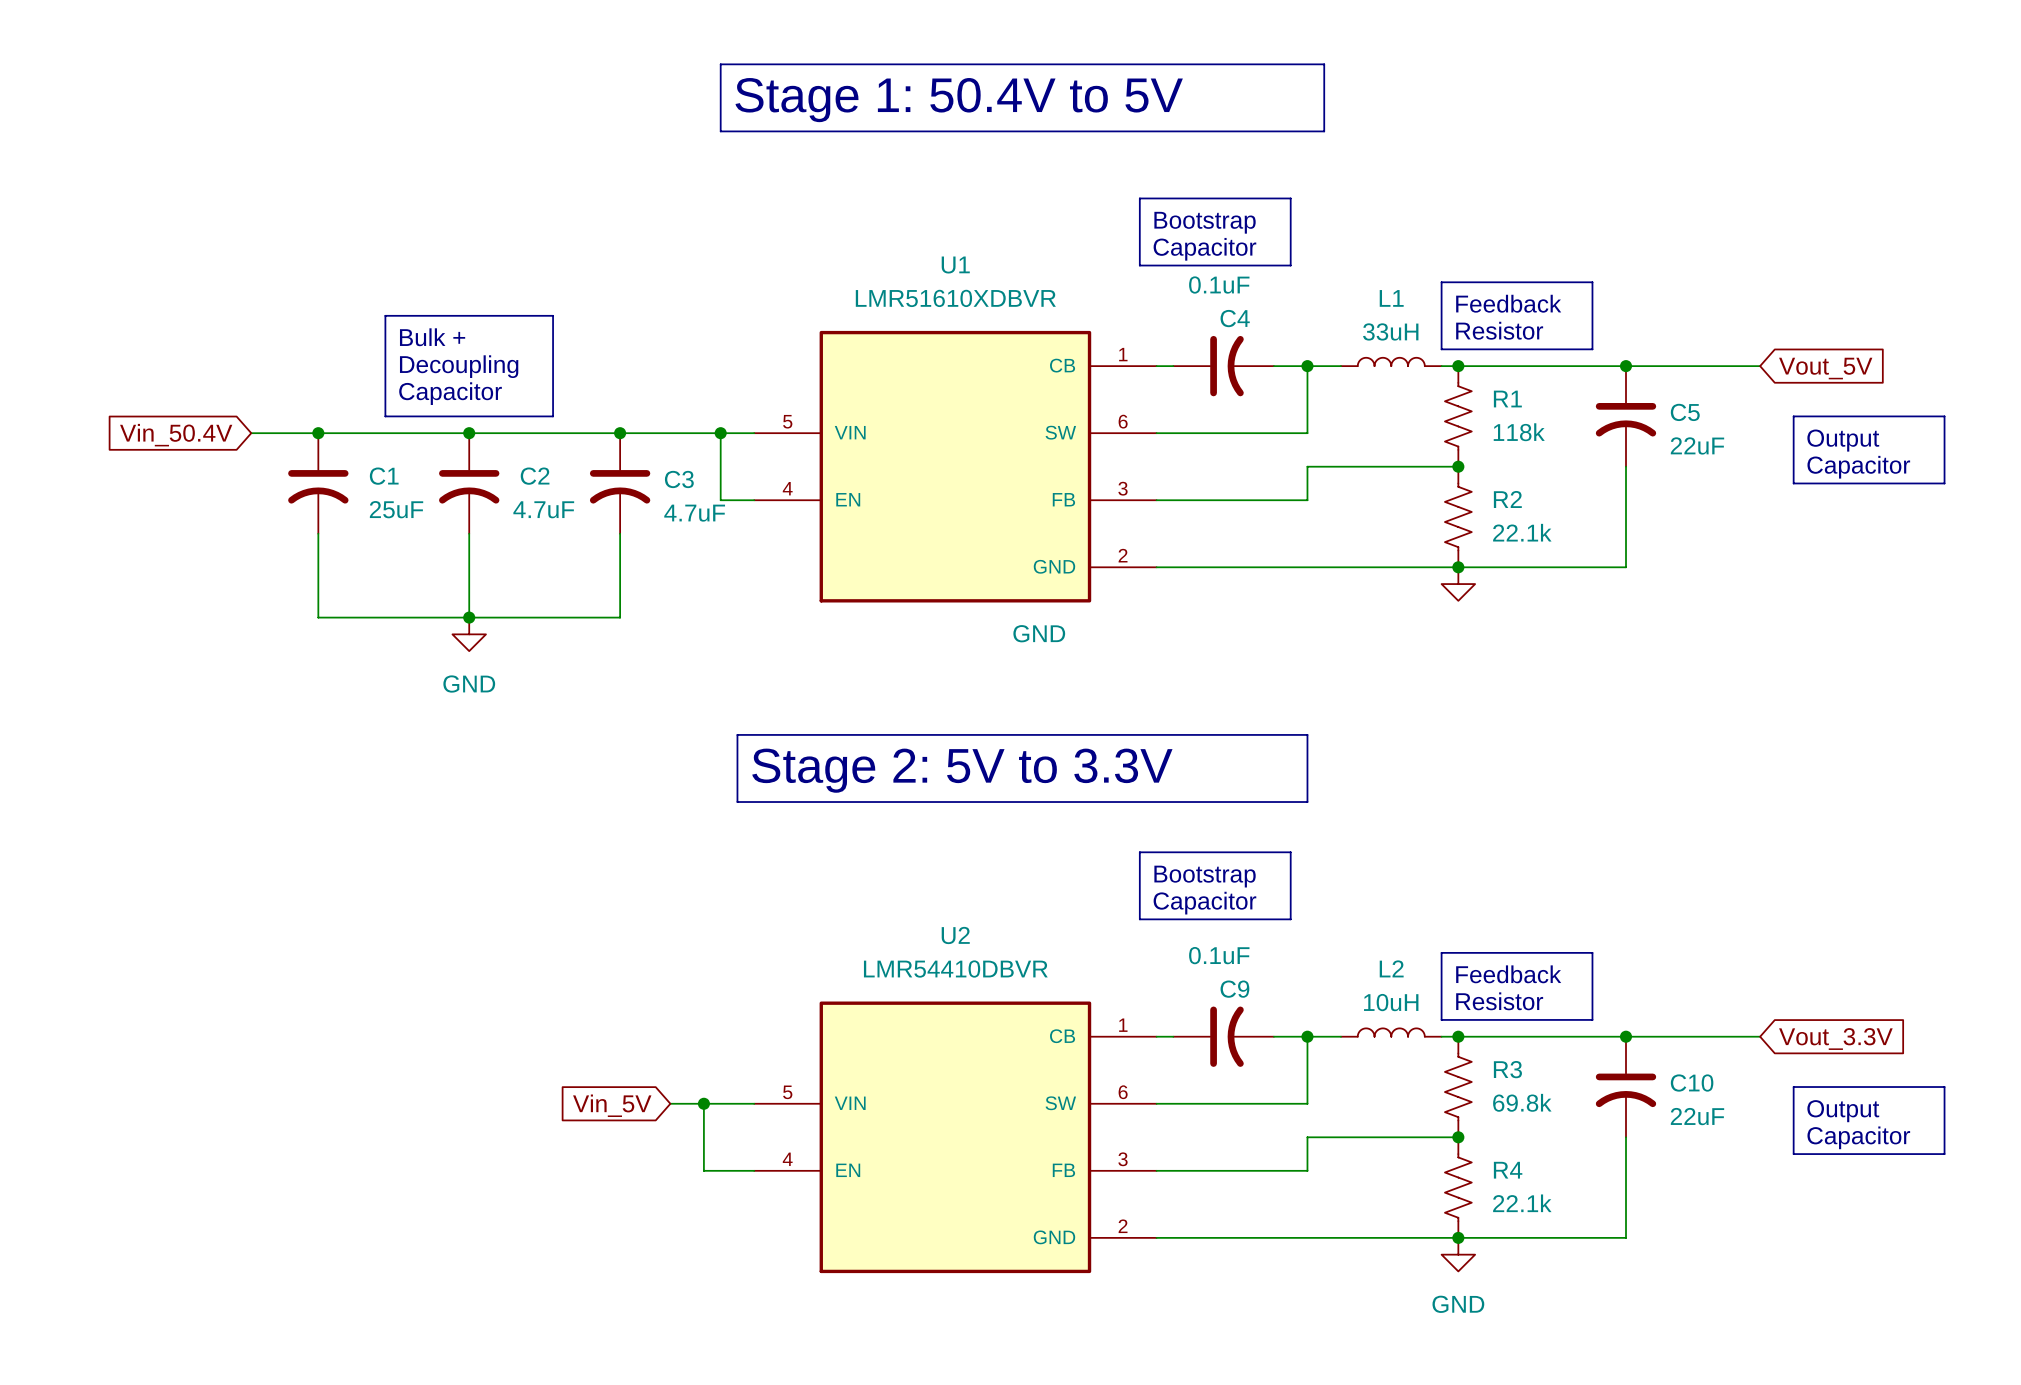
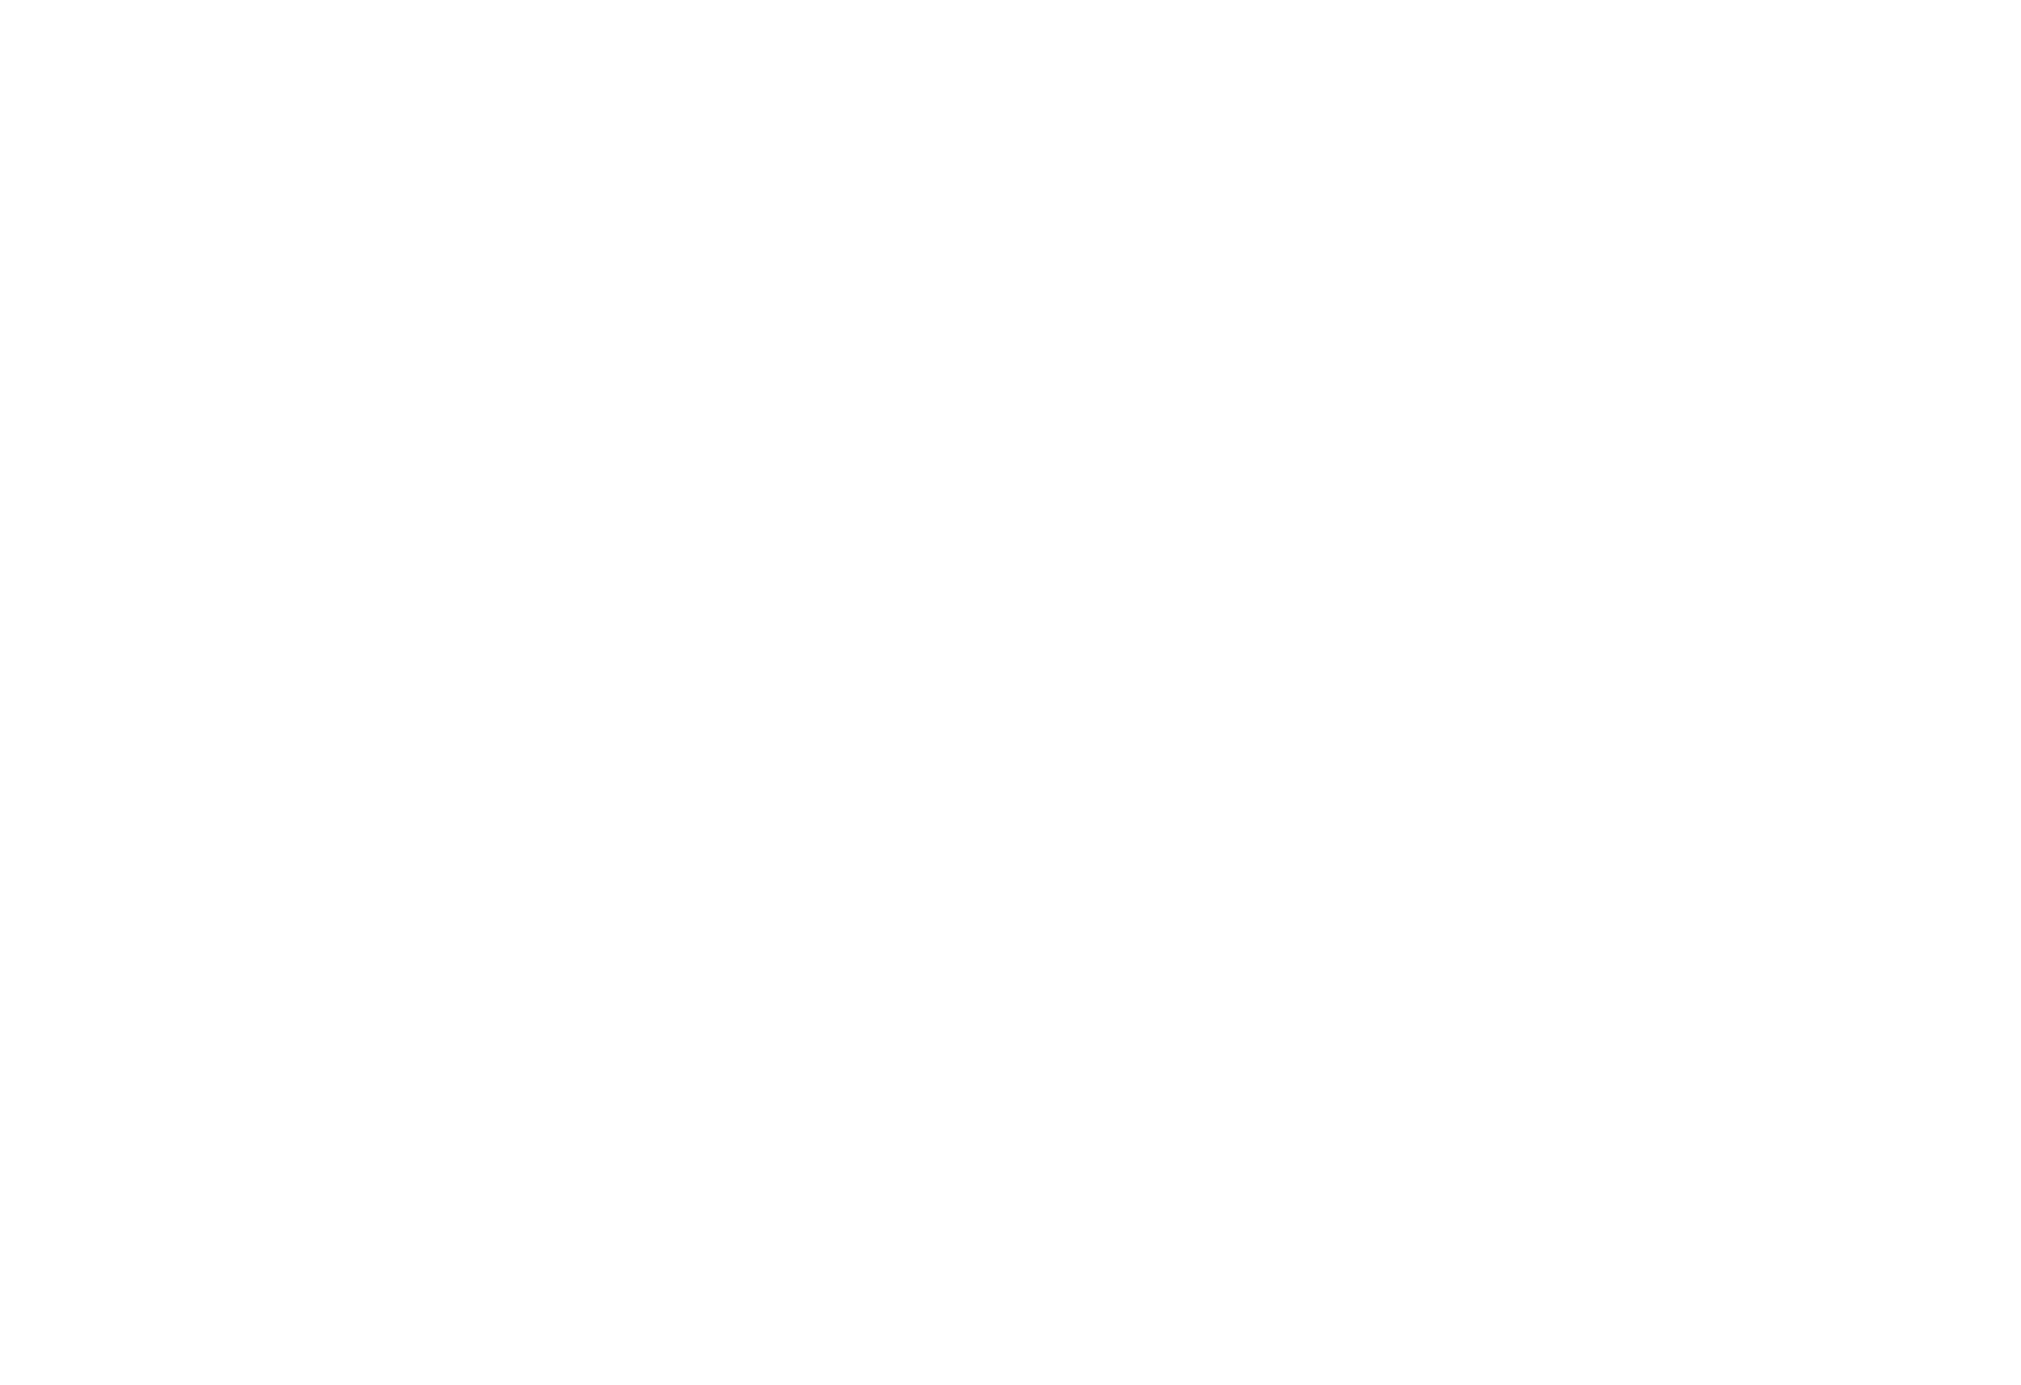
line: (720, 64) (1324, 64) (1324, 131) (720, 131) (720, 64) -> none
text: Stage 1: 50.4V to 5V (959, 100) -> none
line: (1139, 198) (1290, 198) (1290, 265) (1139, 265) (1139, 198) -> none
text: Bootstrap (1205, 222) -> none
text: Capacitor (1204, 249) -> none
line: (1441, 282) (1592, 282) (1592, 349) (1441, 349) (1441, 282) -> none
text: Feedback (1508, 303) -> none
line: (385, 315) (553, 315) (553, 416) (385, 416) (385, 315) -> none
text: Resistor (1499, 330) -> none
text: Bulk + (432, 337) -> none
L1: 33uH (1391, 361) -> none
text: Decoupling (459, 366) -> none
wire: (1156, 366) (1173, 366) -> none
C4: 0.1uF (1223, 366) -> none
wire: (1273, 366) (1341, 366) -> none
wire: (1307, 366) (1307, 433) (1156, 433) -> none
junction: (1307, 366) -> none
wire: (1441, 366) (1760, 366) -> none
junction: (1458, 366) -> none
junction: (1626, 366) -> none
global label: Vout_5V (1825, 368) -> none
text: Capacitor (450, 393) -> none
R1: 118k (1458, 416) -> none
C5: 22uF (1626, 416) -> none
line: (1793, 416) (1793, 483) (1944, 483) (1944, 416) (1793, 416) -> none
wire: (251, 433) (754, 433) -> none
junction: (318, 433) -> none
junction: (469, 433) -> none
junction: (620, 433) -> none
wire: (720, 433) (720, 500) (754, 500) -> none
junction: (720, 433) -> none
global label: Vin_50.4V (176, 435) -> none
text: Output (1843, 440) -> none
U1: LMR51610XDBVR (955, 466) -> none
wire: (1458, 466) (1307, 466) (1307, 500) (1156, 500) -> none
junction: (1458, 466) -> none
wire: (1626, 466) (1626, 567) (1156, 567) -> none
text: Capacitor (1858, 467) -> none
C1: 25uF (318, 483) -> none
C2: 4.7uF (469, 483) -> none
C3: 4.7uF (620, 483) -> none
R2: 22.1k (1458, 517) -> none
wire: (318, 533) (318, 617) (620, 617) (620, 533) -> none
wire: (469, 533) (469, 617) -> none
junction: (1458, 567) -> none
power symbol: GND (1458, 584) -> none
junction: (469, 617) -> none
power symbol: GND (469, 634) -> none
line: (737, 734) (1307, 734) (1307, 802) (737, 802) (737, 734) -> none
text: Stage 2: 5V to 3.3V (962, 770) -> none
line: (1139, 852) (1139, 919) (1290, 919) (1290, 852) (1139, 852) -> none
text: Bootstrap (1205, 876) -> none
text: Capacitor (1204, 903) -> none
line: (1441, 952) (1441, 1019) (1592, 1019) (1592, 952) (1441, 952) -> none
text: Feedback (1508, 974) -> none
text: Resistor (1499, 1001) -> none
L2: 10uH (1391, 1032) -> none
wire: (1156, 1036) (1173, 1036) -> none
C9: 0.1uF (1223, 1036) -> none
wire: (1273, 1036) (1341, 1036) -> none
wire: (1307, 1036) (1307, 1103) (1156, 1103) -> none
junction: (1307, 1036) -> none
wire: (1441, 1036) (1760, 1036) -> none
junction: (1458, 1036) -> none
junction: (1626, 1036) -> none
global label: Vout_3.3V (1835, 1039) -> none
R3: 69.8k (1458, 1087) -> none
C10: 22uF (1626, 1087) -> none
line: (1793, 1087) (1944, 1087) (1944, 1154) (1793, 1154) (1793, 1087) -> none
wire: (670, 1103) (754, 1103) -> none
wire: (703, 1103) (703, 1170) (754, 1170) -> none
junction: (703, 1103) -> none
global label: Vin_5V (612, 1105) -> none
text: Output (1843, 1111) -> none
U2: LMR54410DBVR (955, 1137) -> none
wire: (1458, 1137) (1307, 1137) (1307, 1170) (1156, 1170) -> none
junction: (1458, 1137) -> none
wire: (1626, 1137) (1626, 1237) (1156, 1237) -> none
text: Capacitor (1858, 1137) -> none
R4: 22.1k (1458, 1187) -> none
junction: (1458, 1237) -> none
power symbol: GND (1458, 1254) -> none

